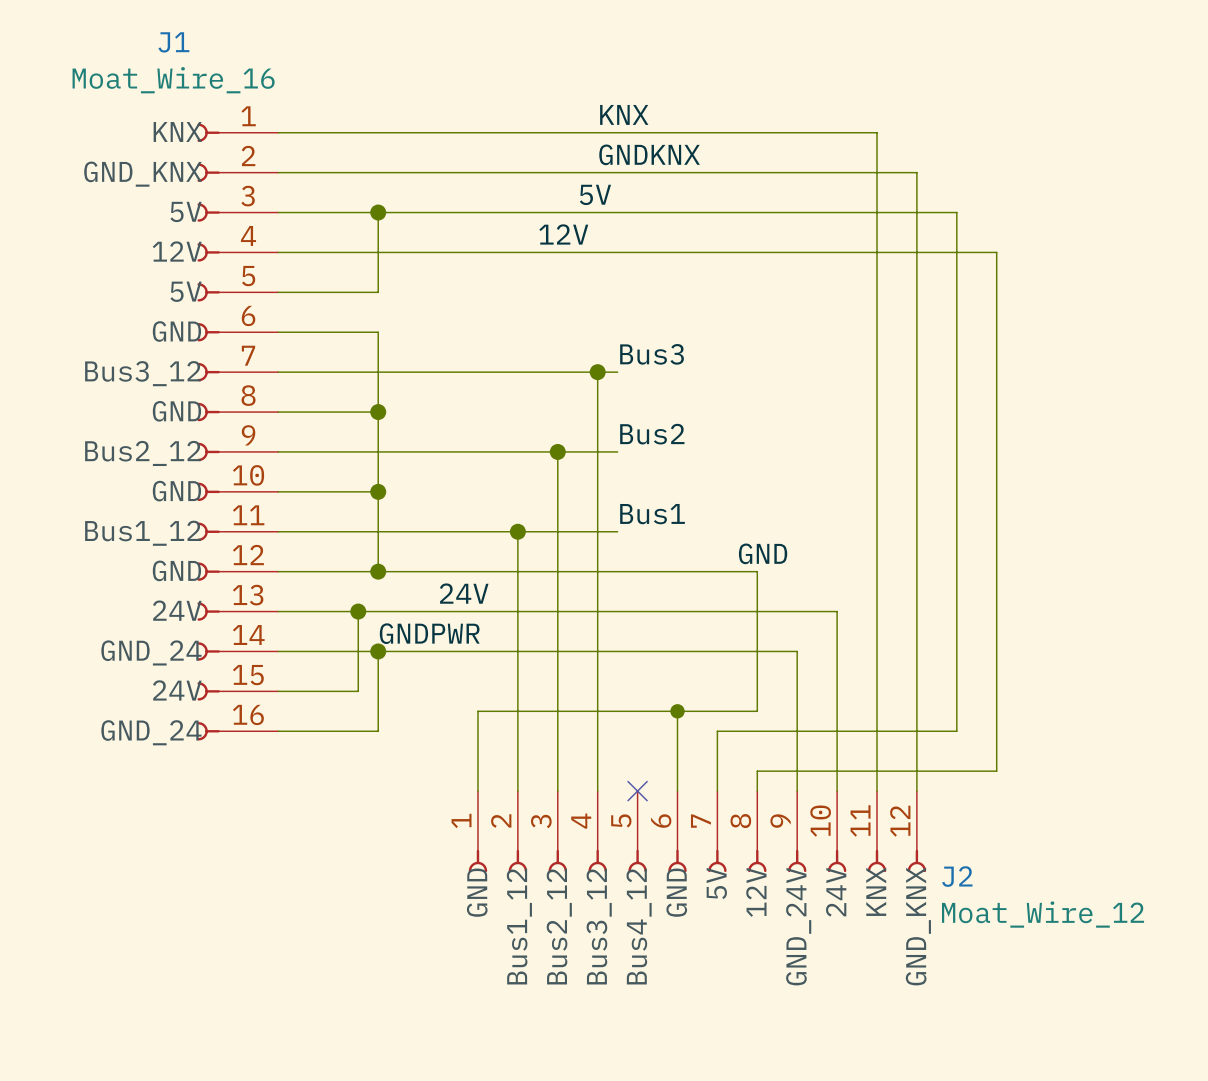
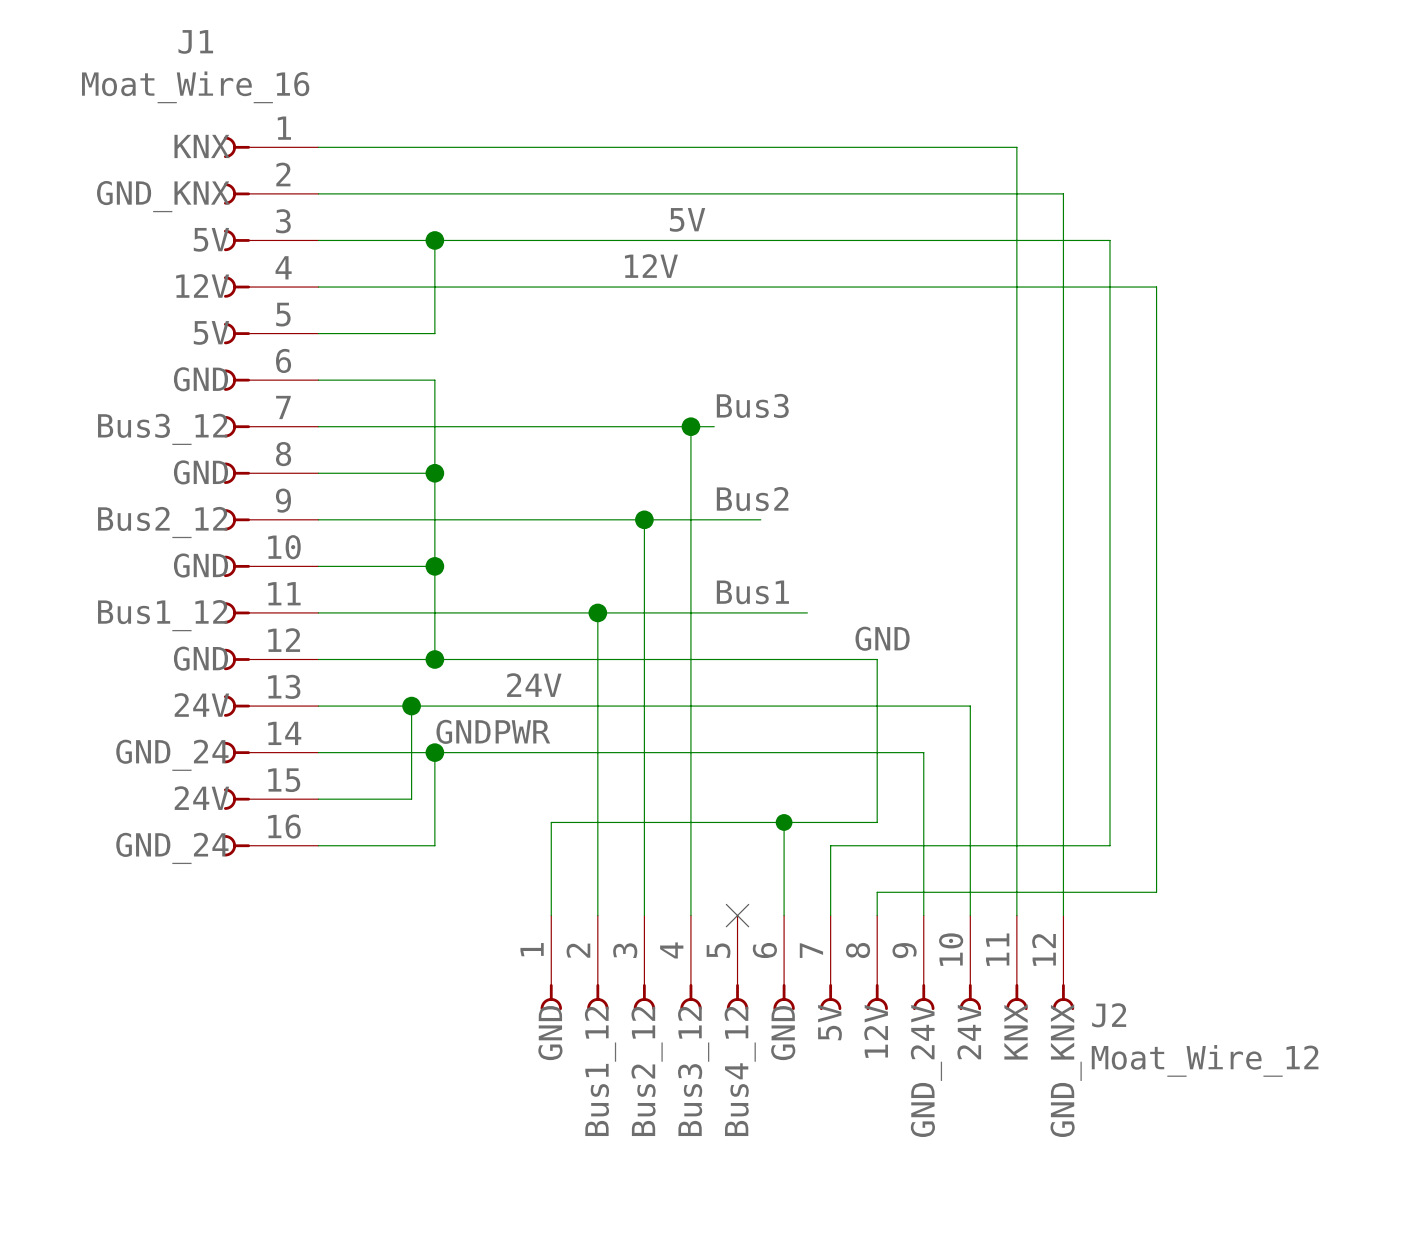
label: KNX (624, 114) -> none
label: GNDKNX (649, 154) -> none
wire: none -> (714, 519) (760, 519)
wire: none -> (714, 612) (807, 612)

